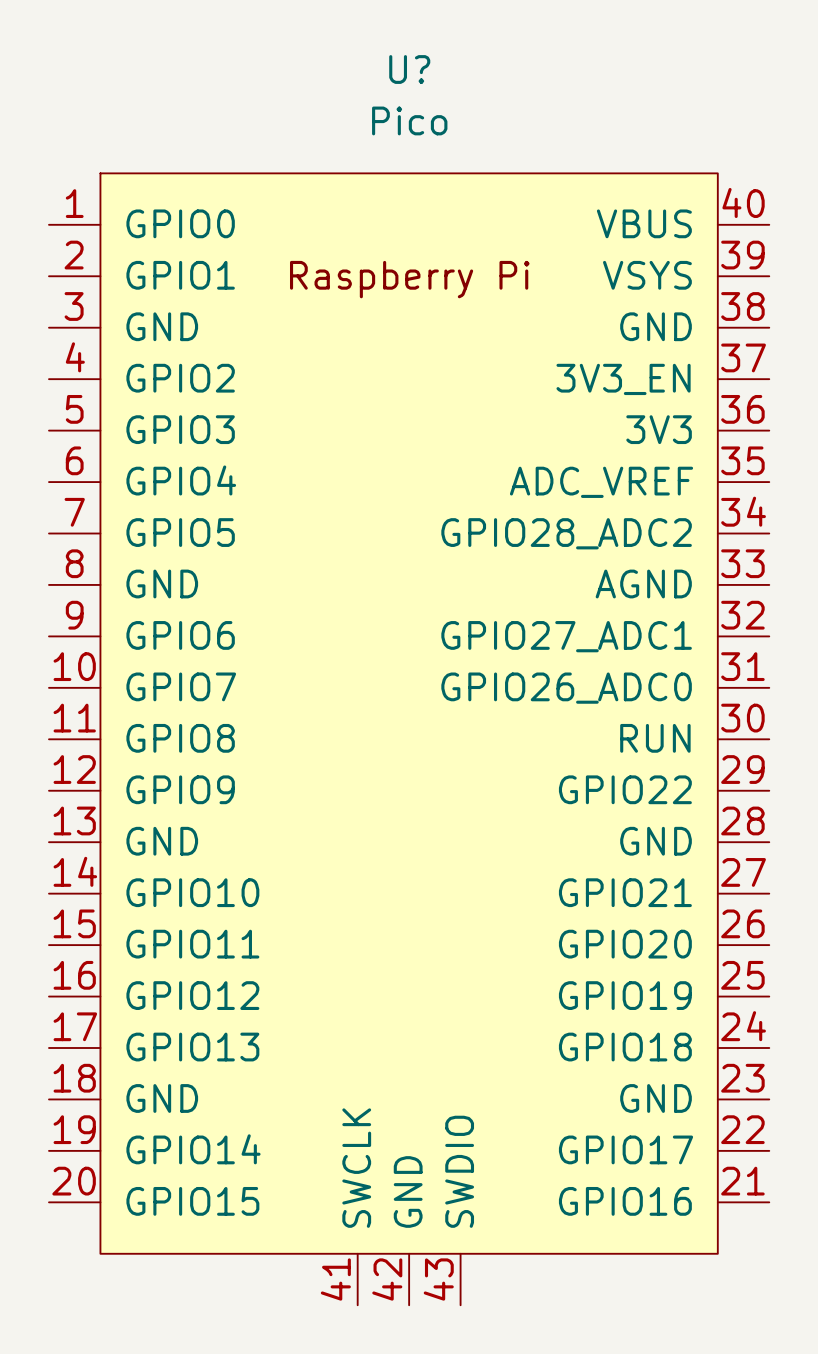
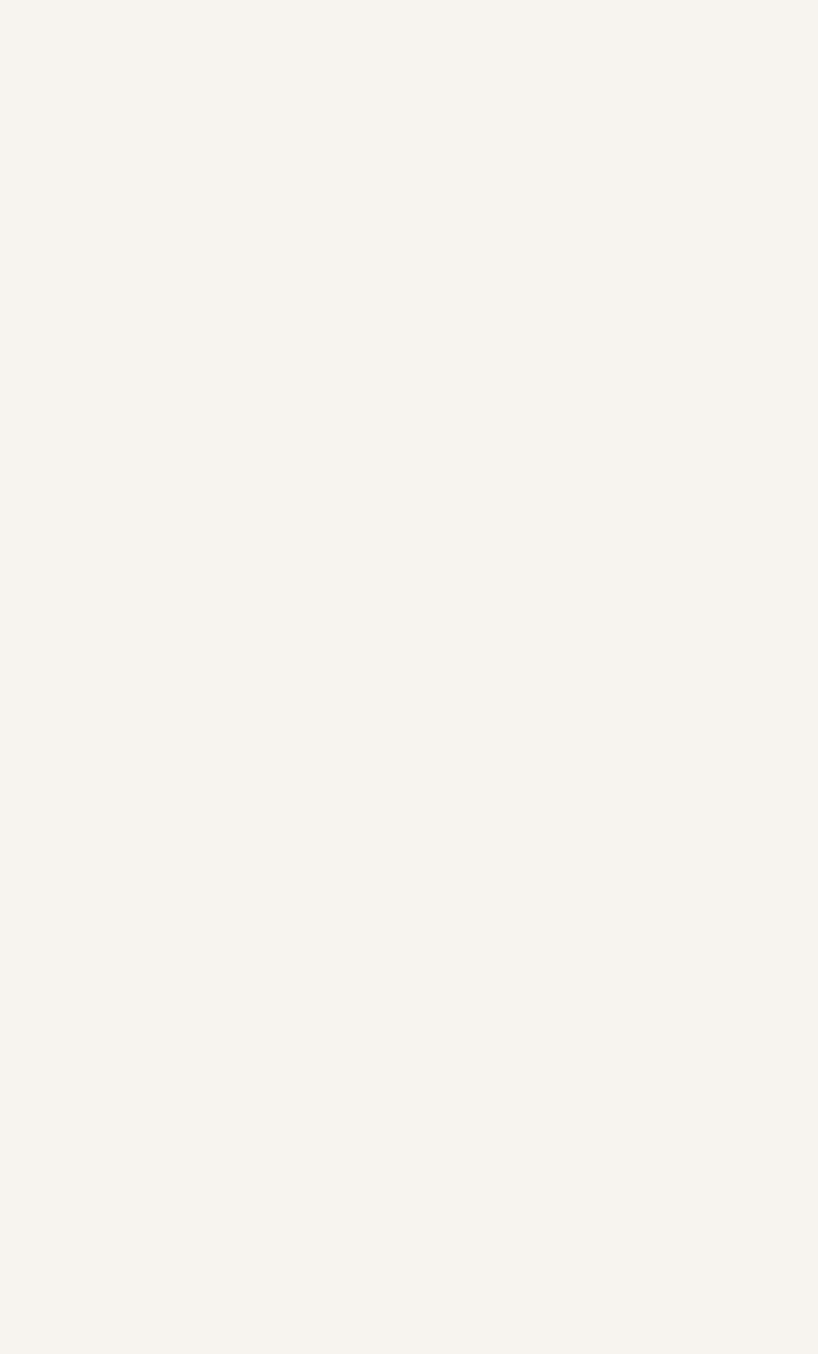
U?: Pico (409, 739) -> none

